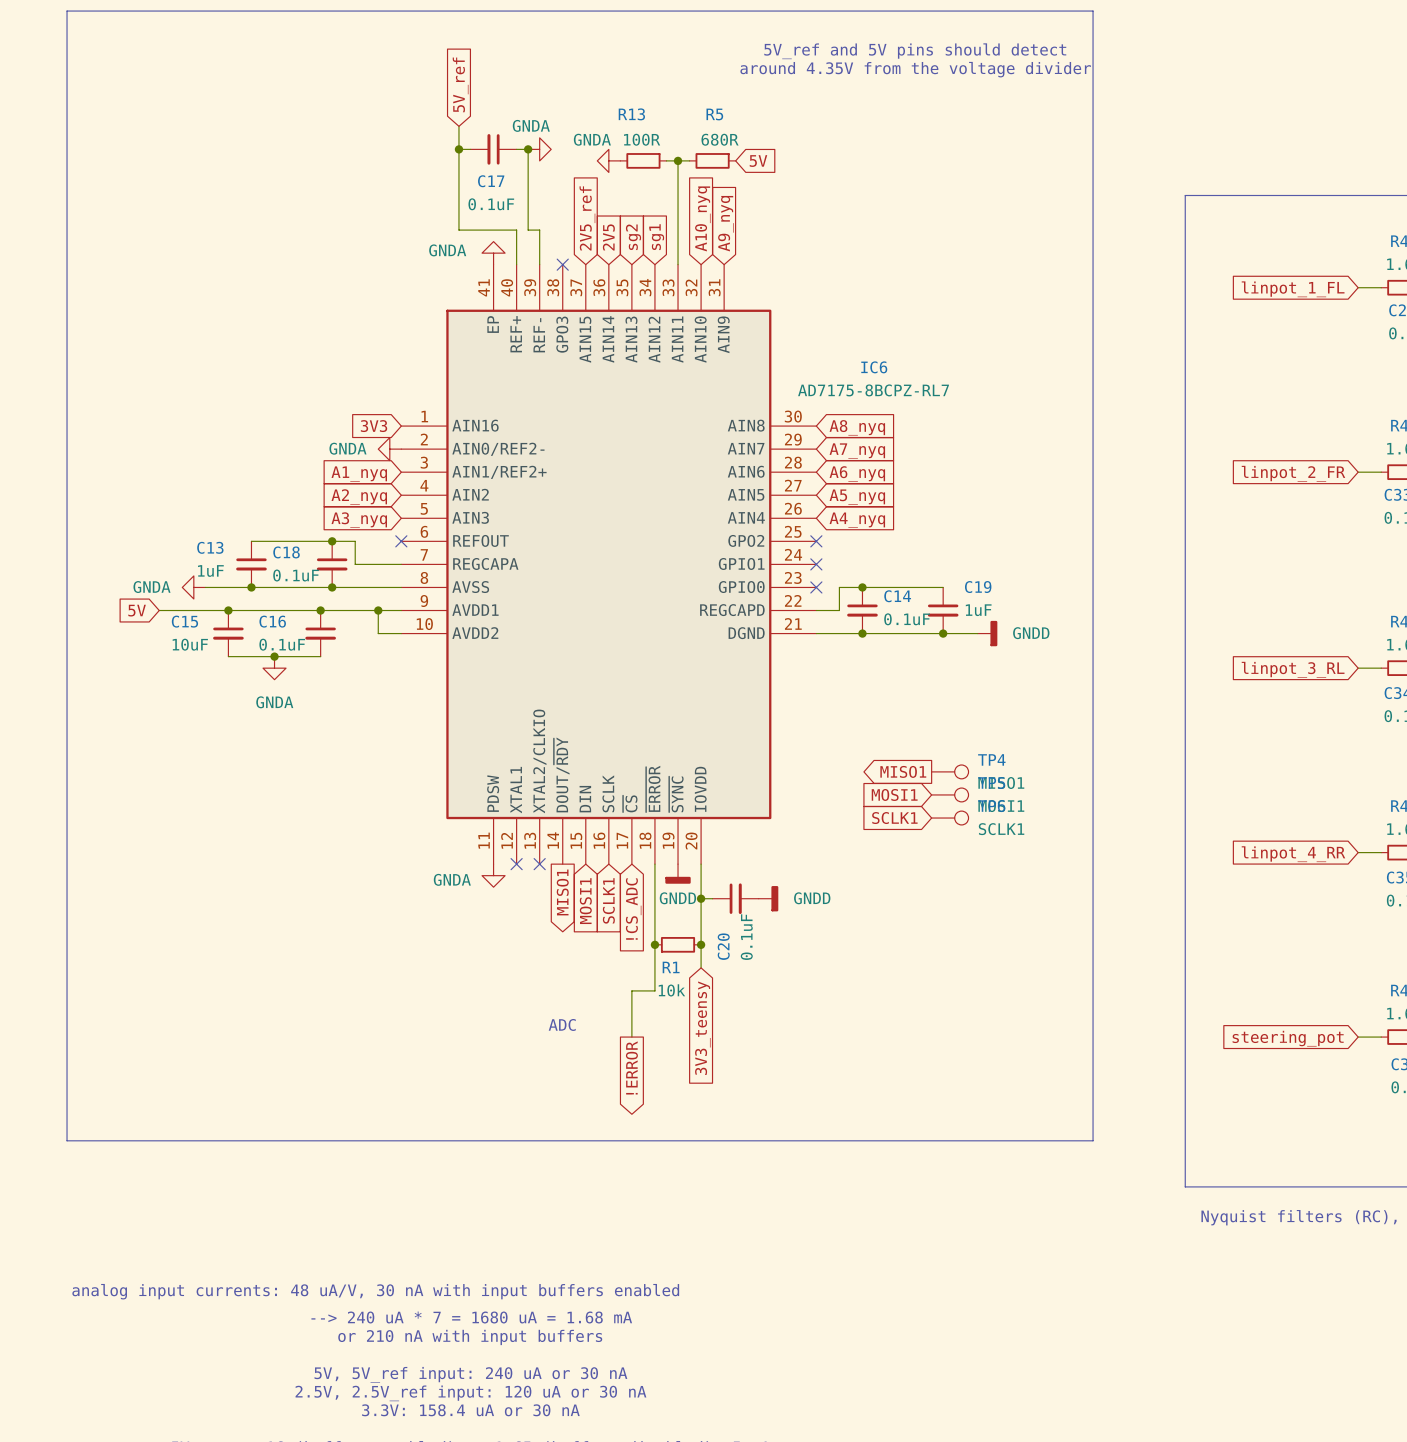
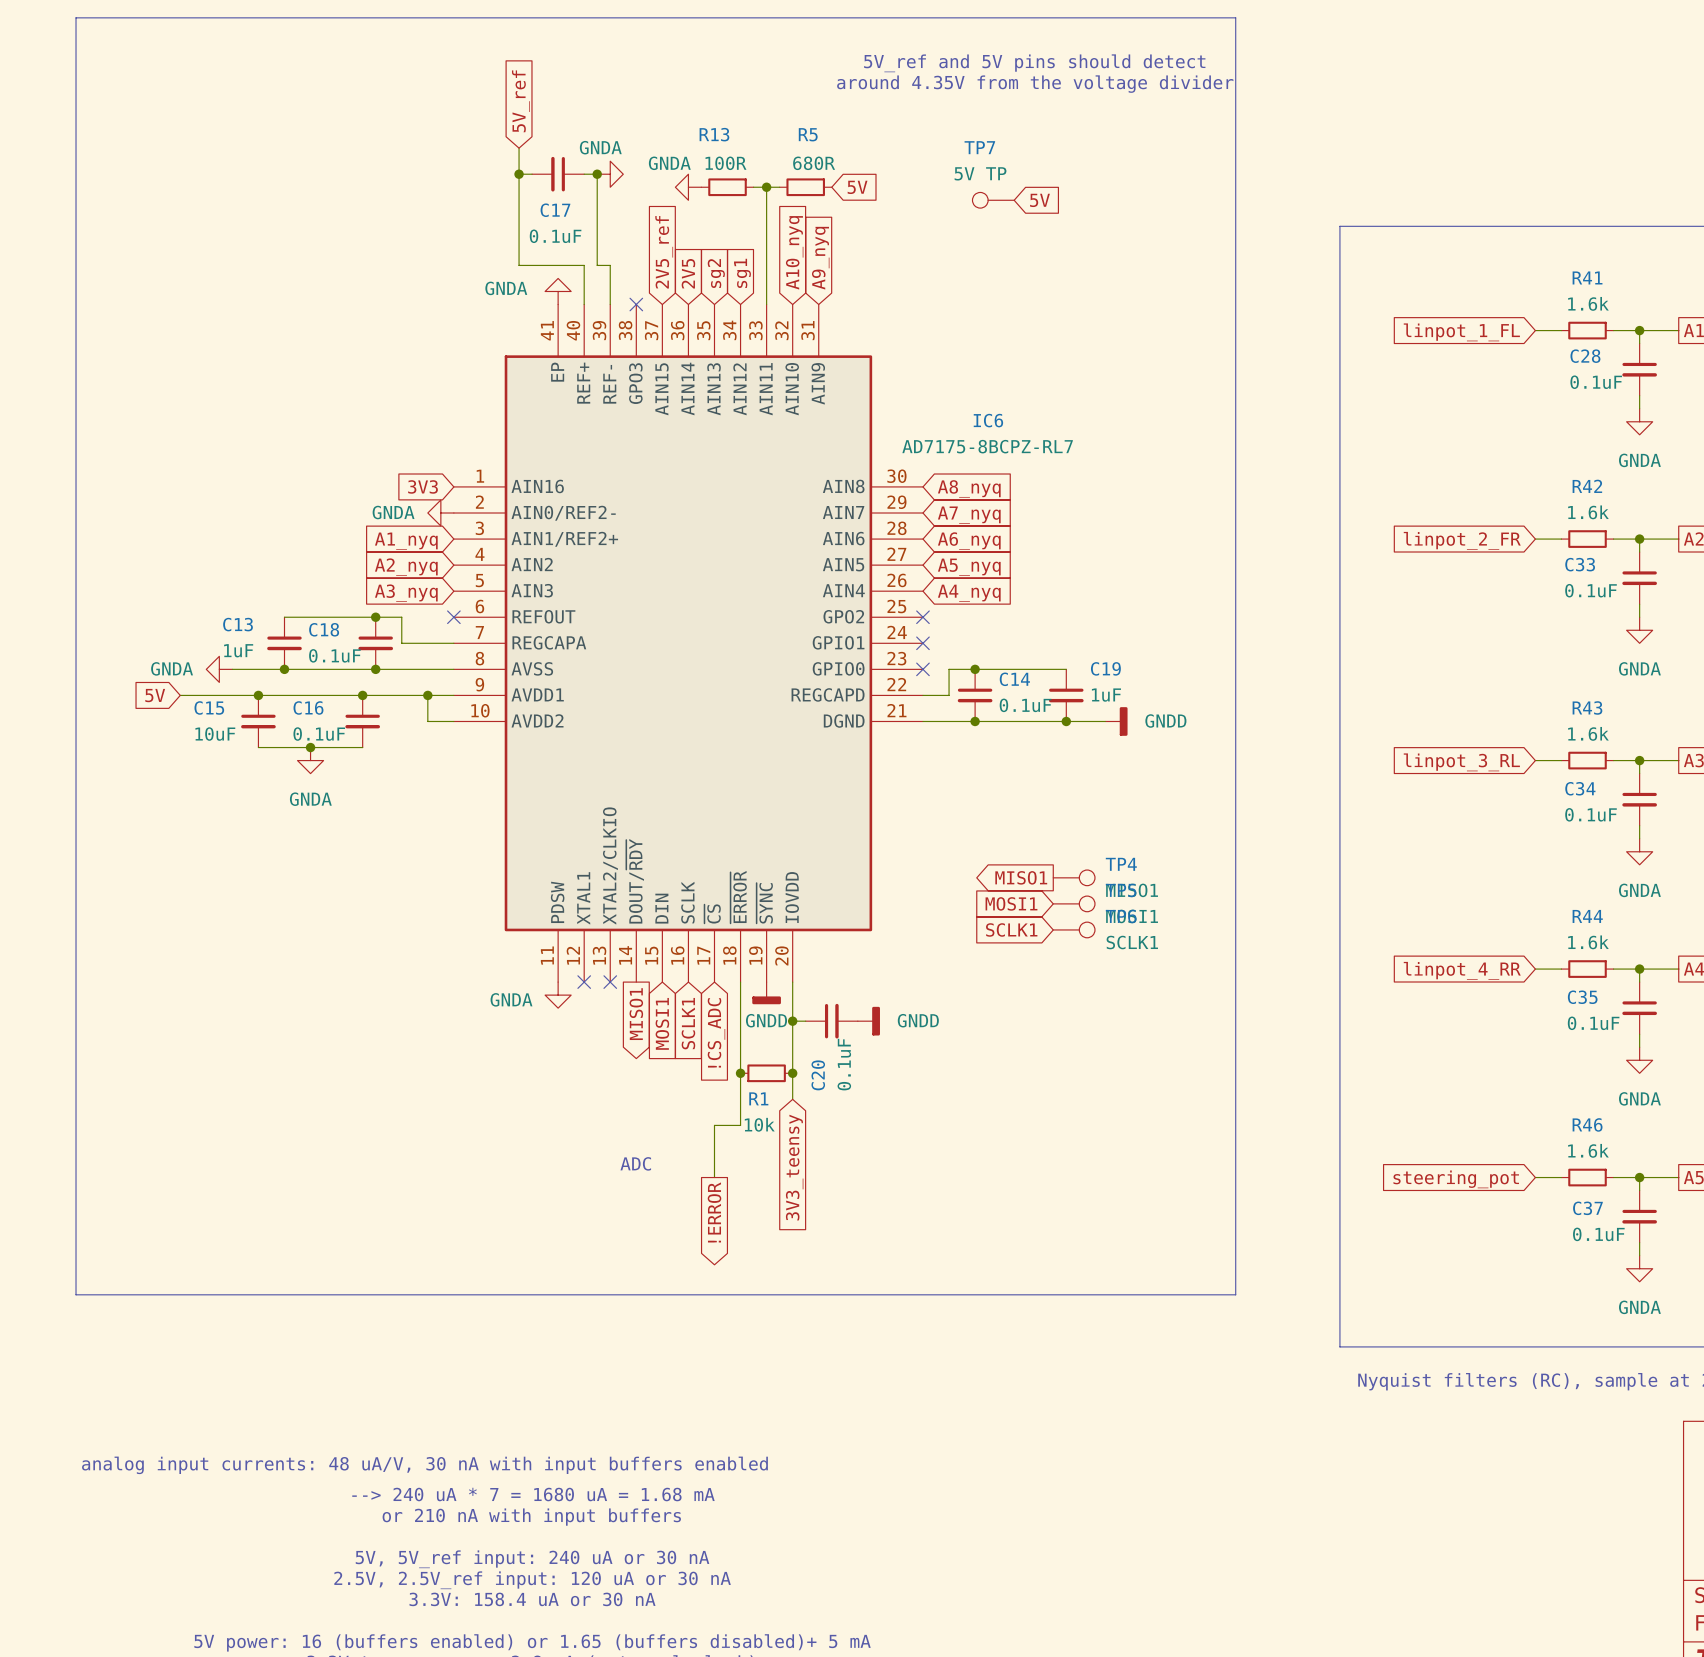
TP7: none -> 5V TP (993, 200)
global label: none -> 5V (1039, 200)

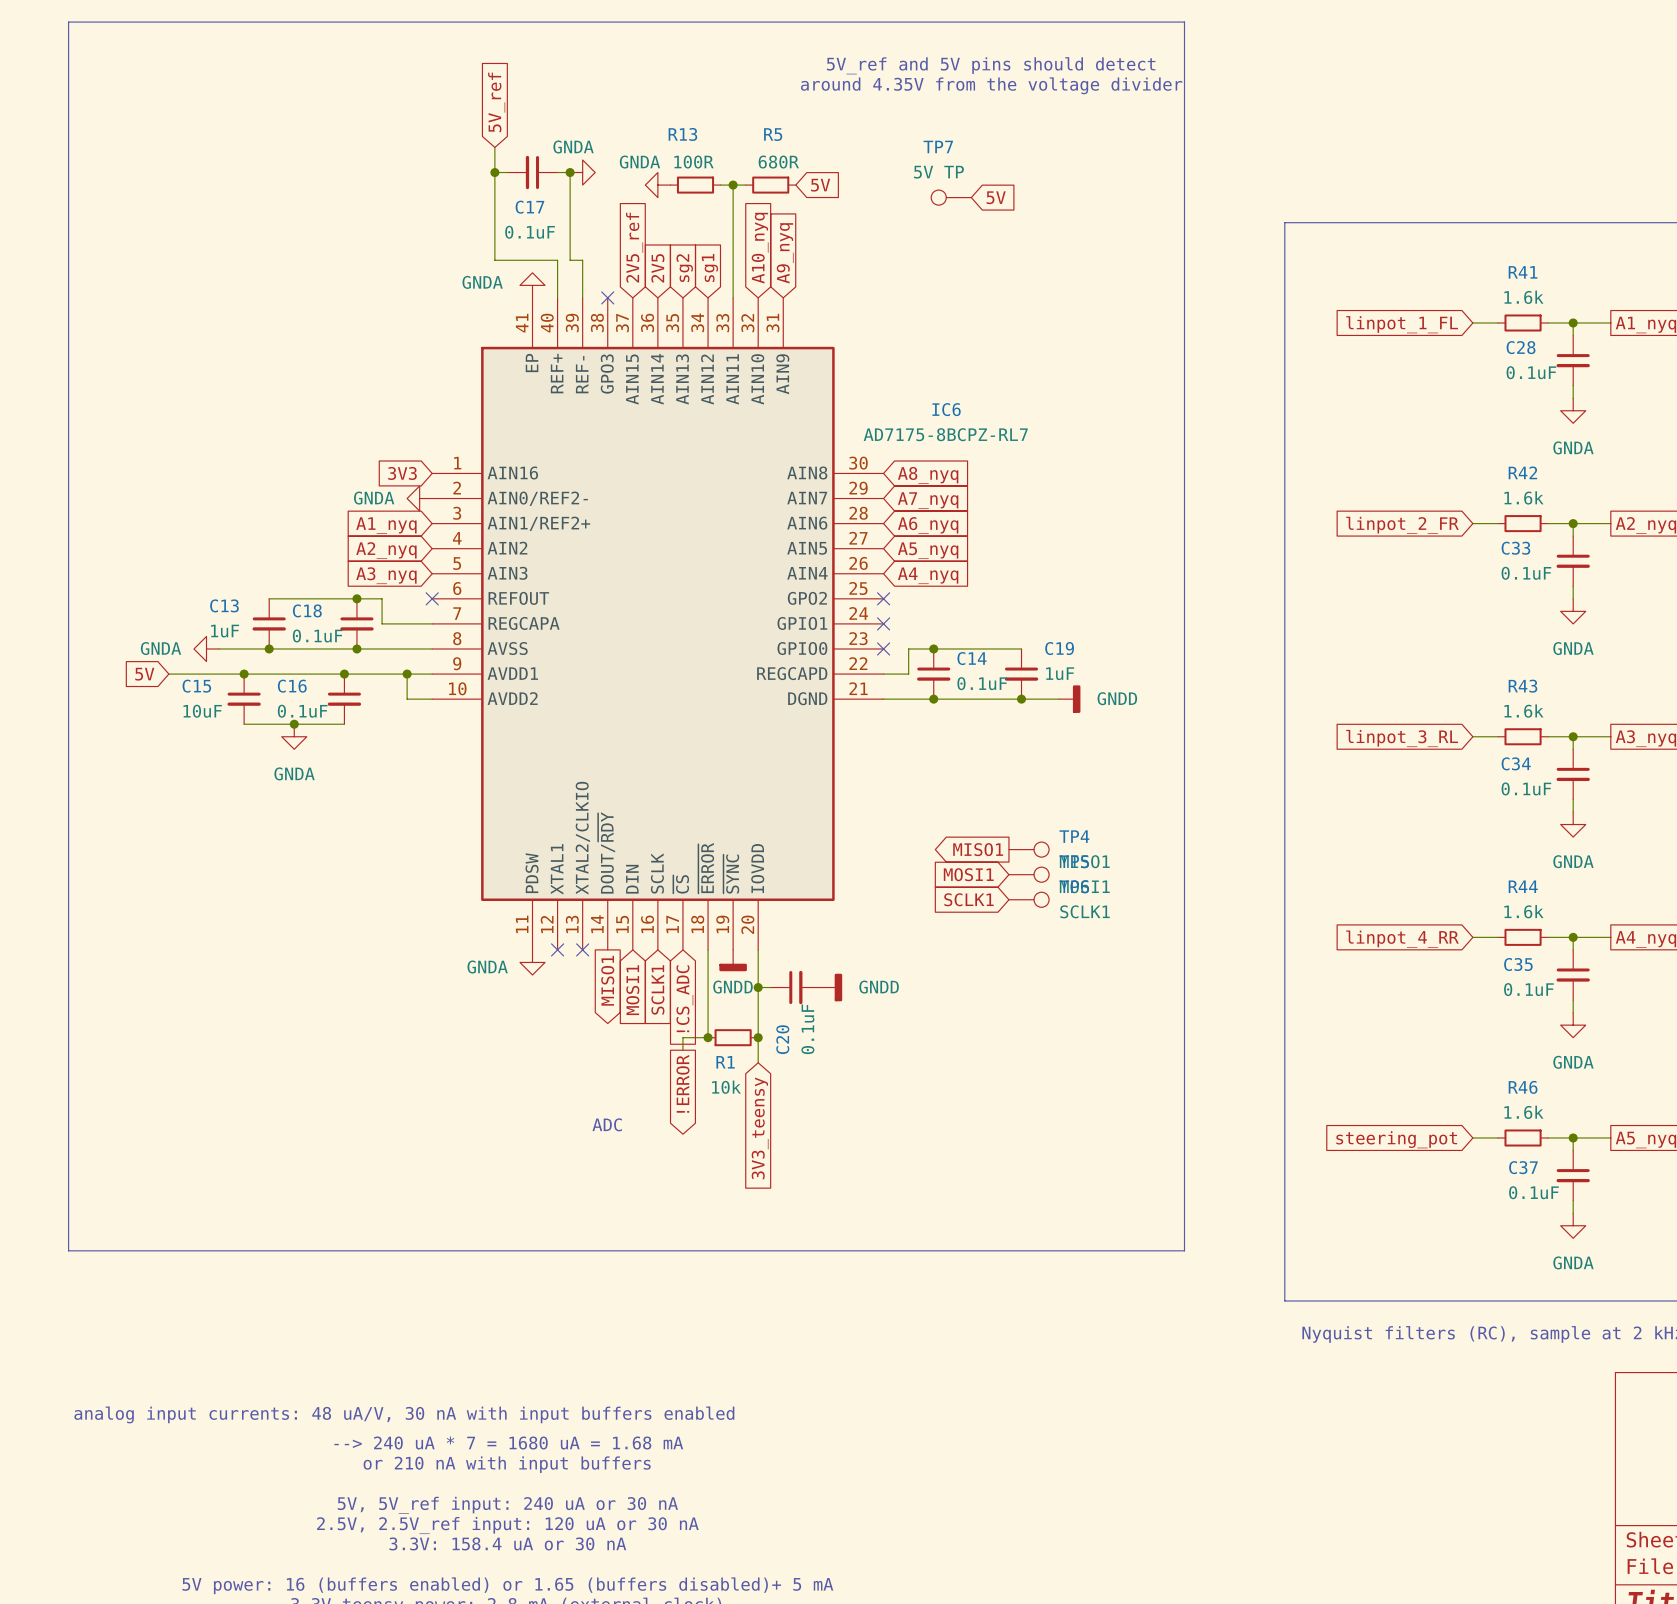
wire: (740, 1073) (740, 1125) (714, 1125) (714, 1177) -> (708, 1037) (682, 1037) (682, 1050)
global label position: !ERROR (714, 1212) -> !ERROR (682, 1083)

